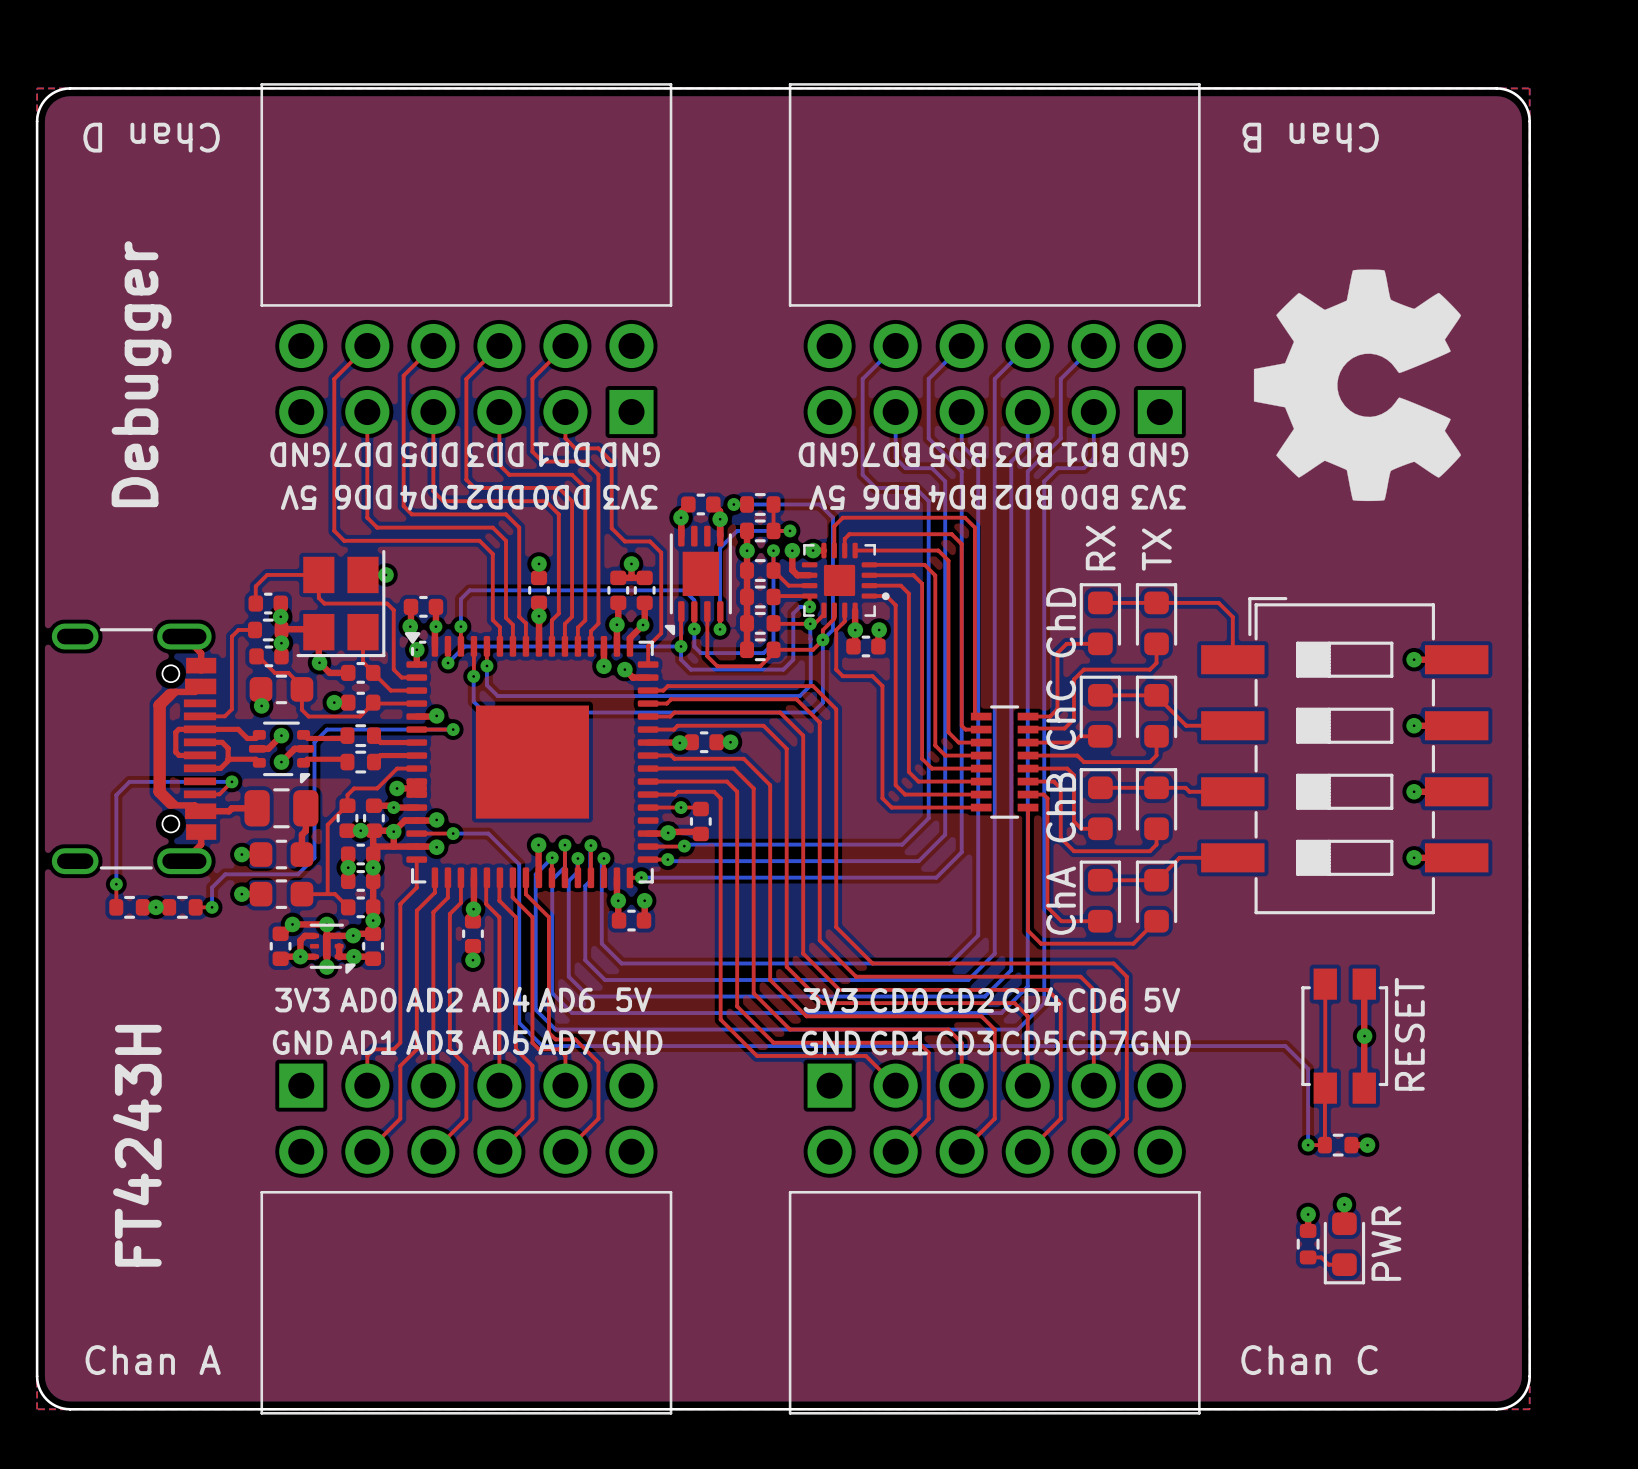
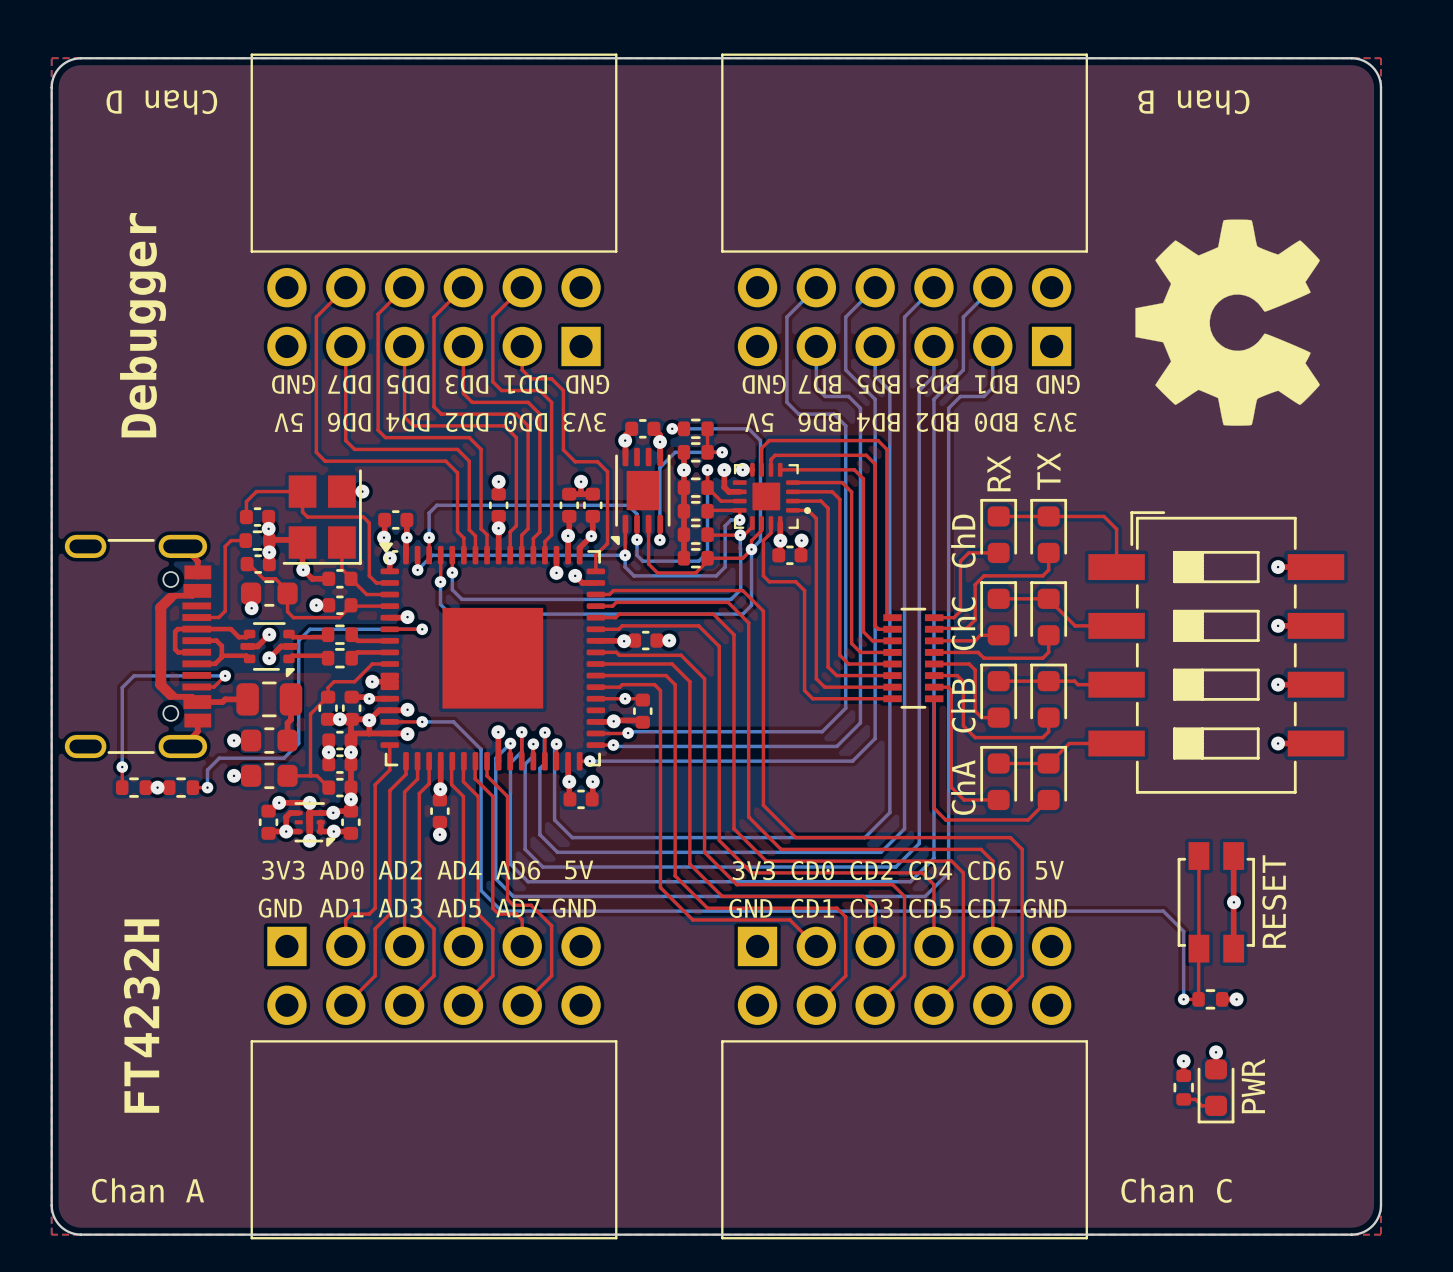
text: FT4243H (137, 1145) -> FT4232H (141, 1016)

